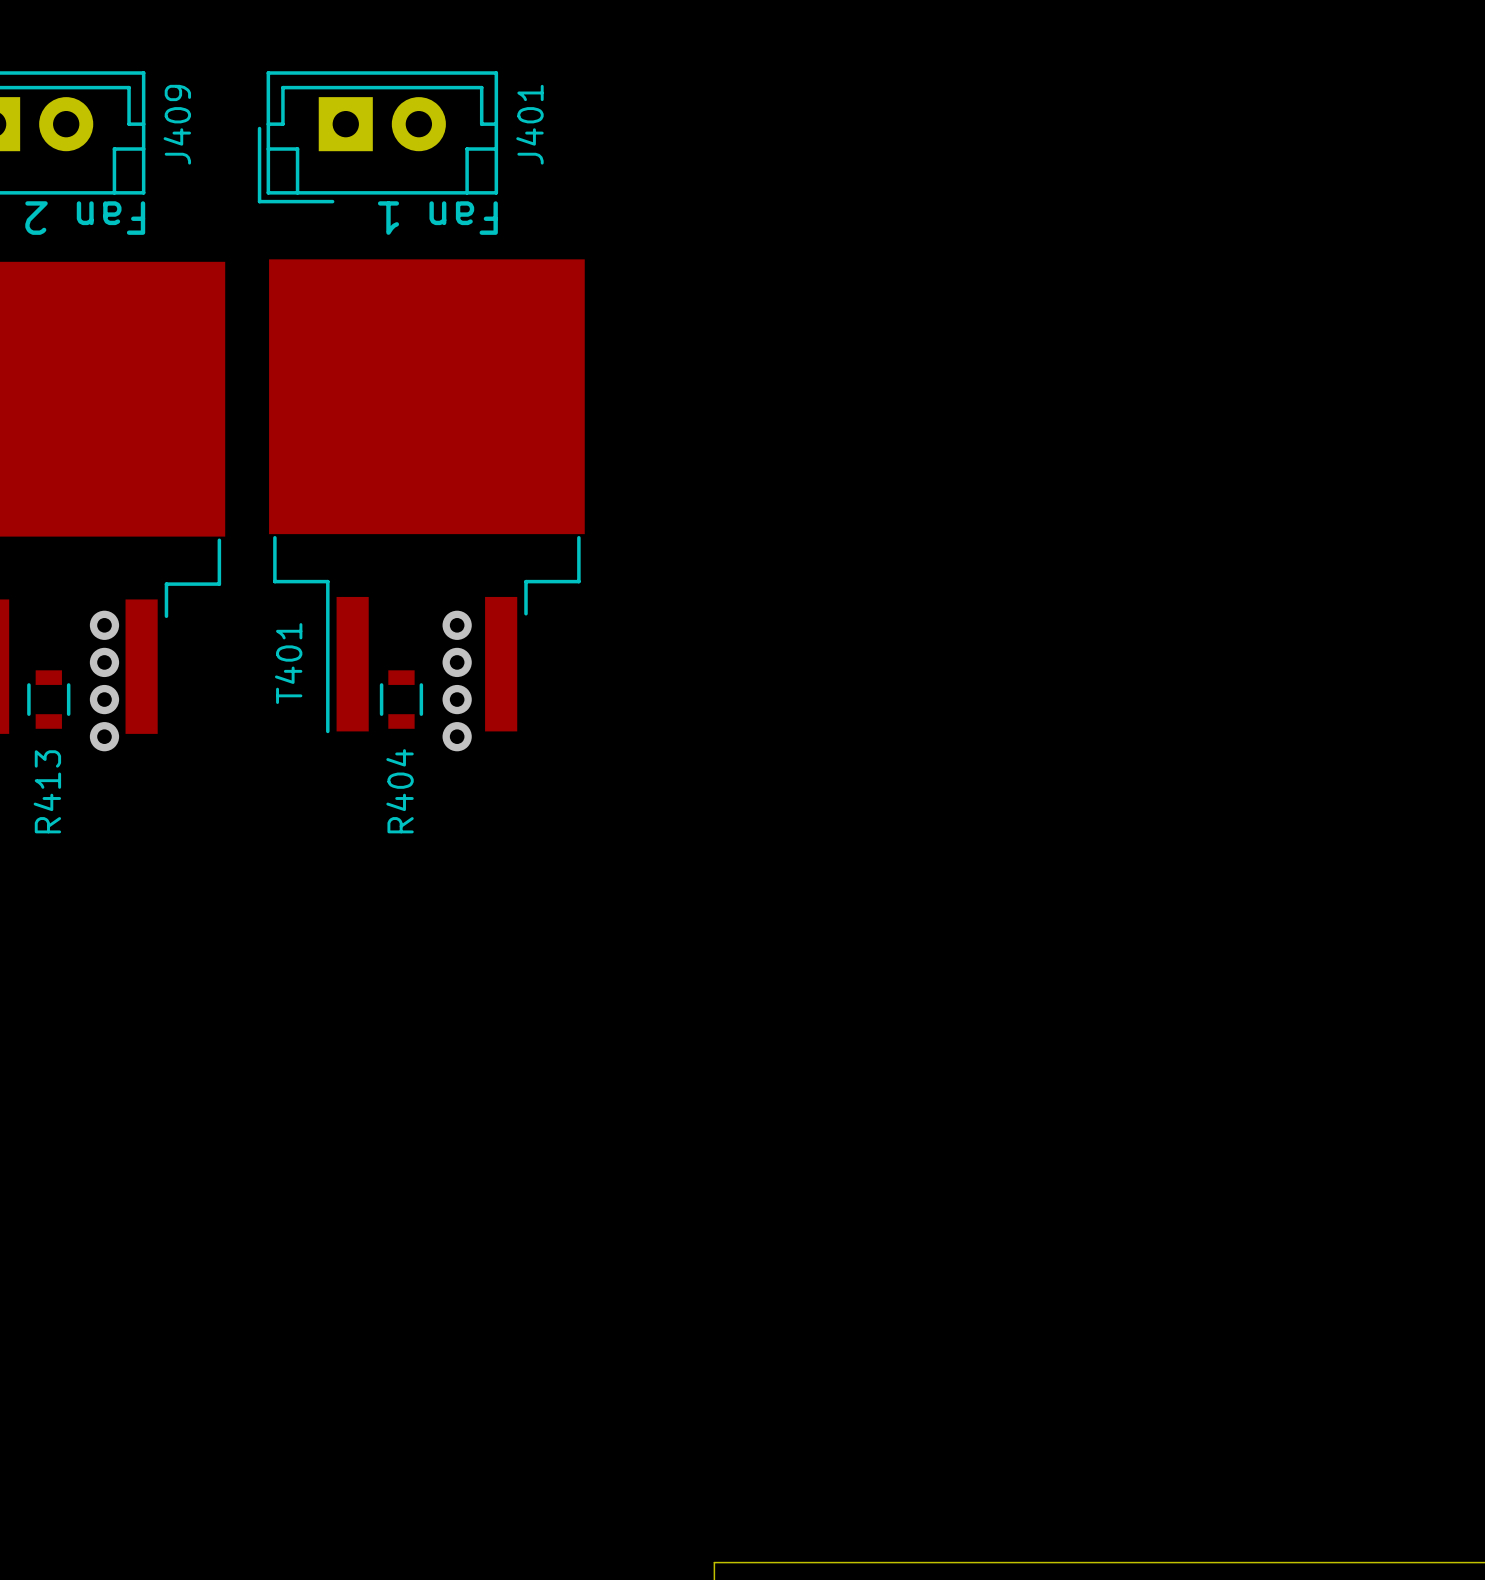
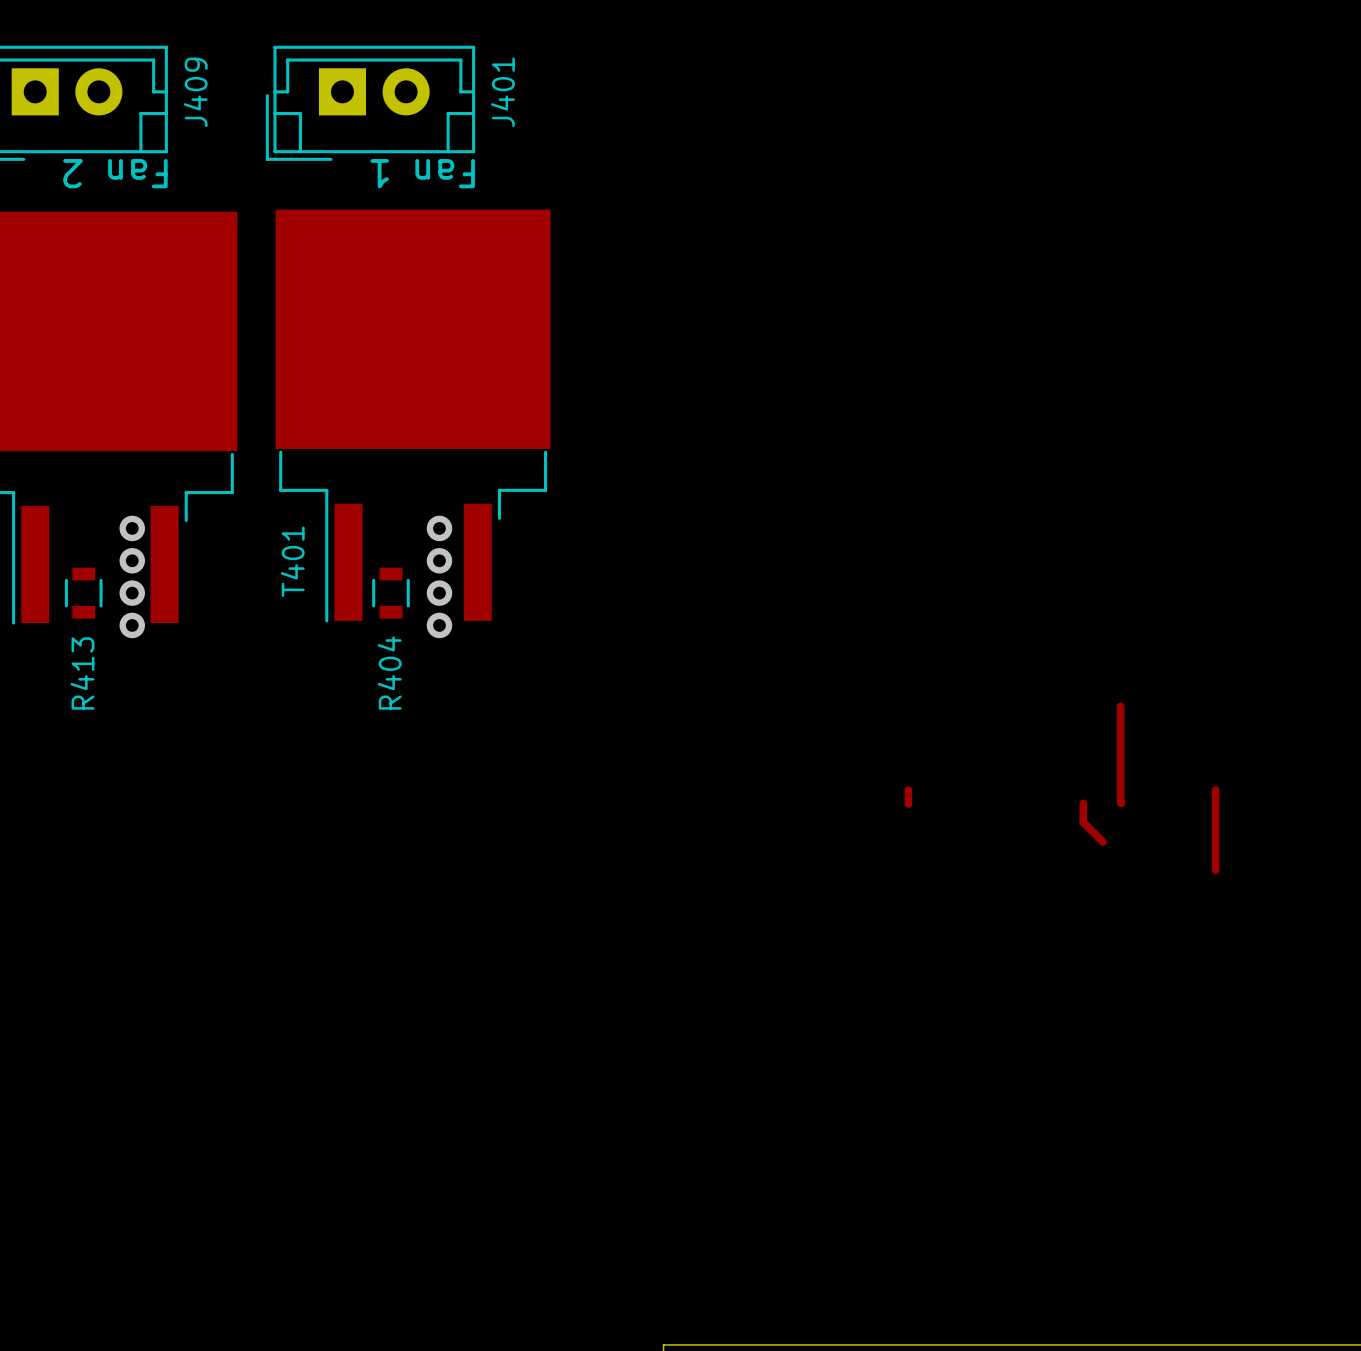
track: none -> (1120, 706) (1121, 803)
track: none -> (908, 790) (908, 804)
track: none -> (1215, 790) (1215, 870)
track: none -> (1083, 803) (1083, 822) (1103, 842)

